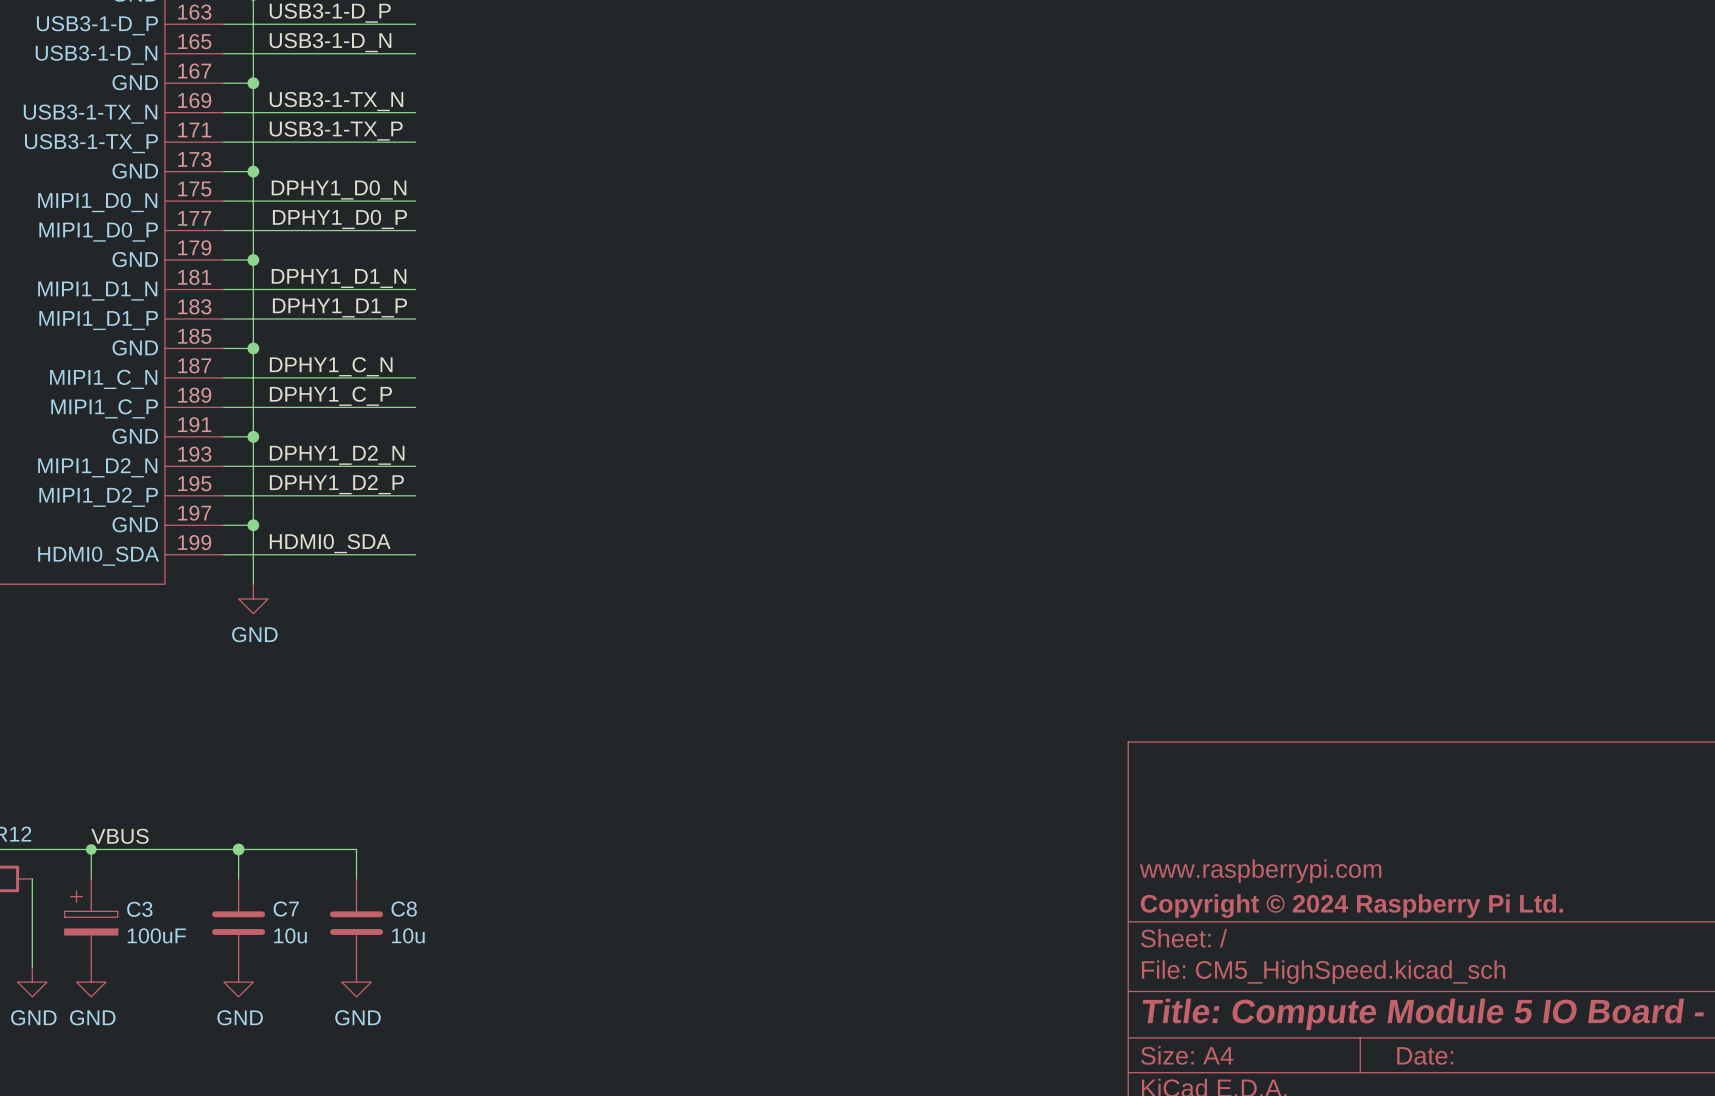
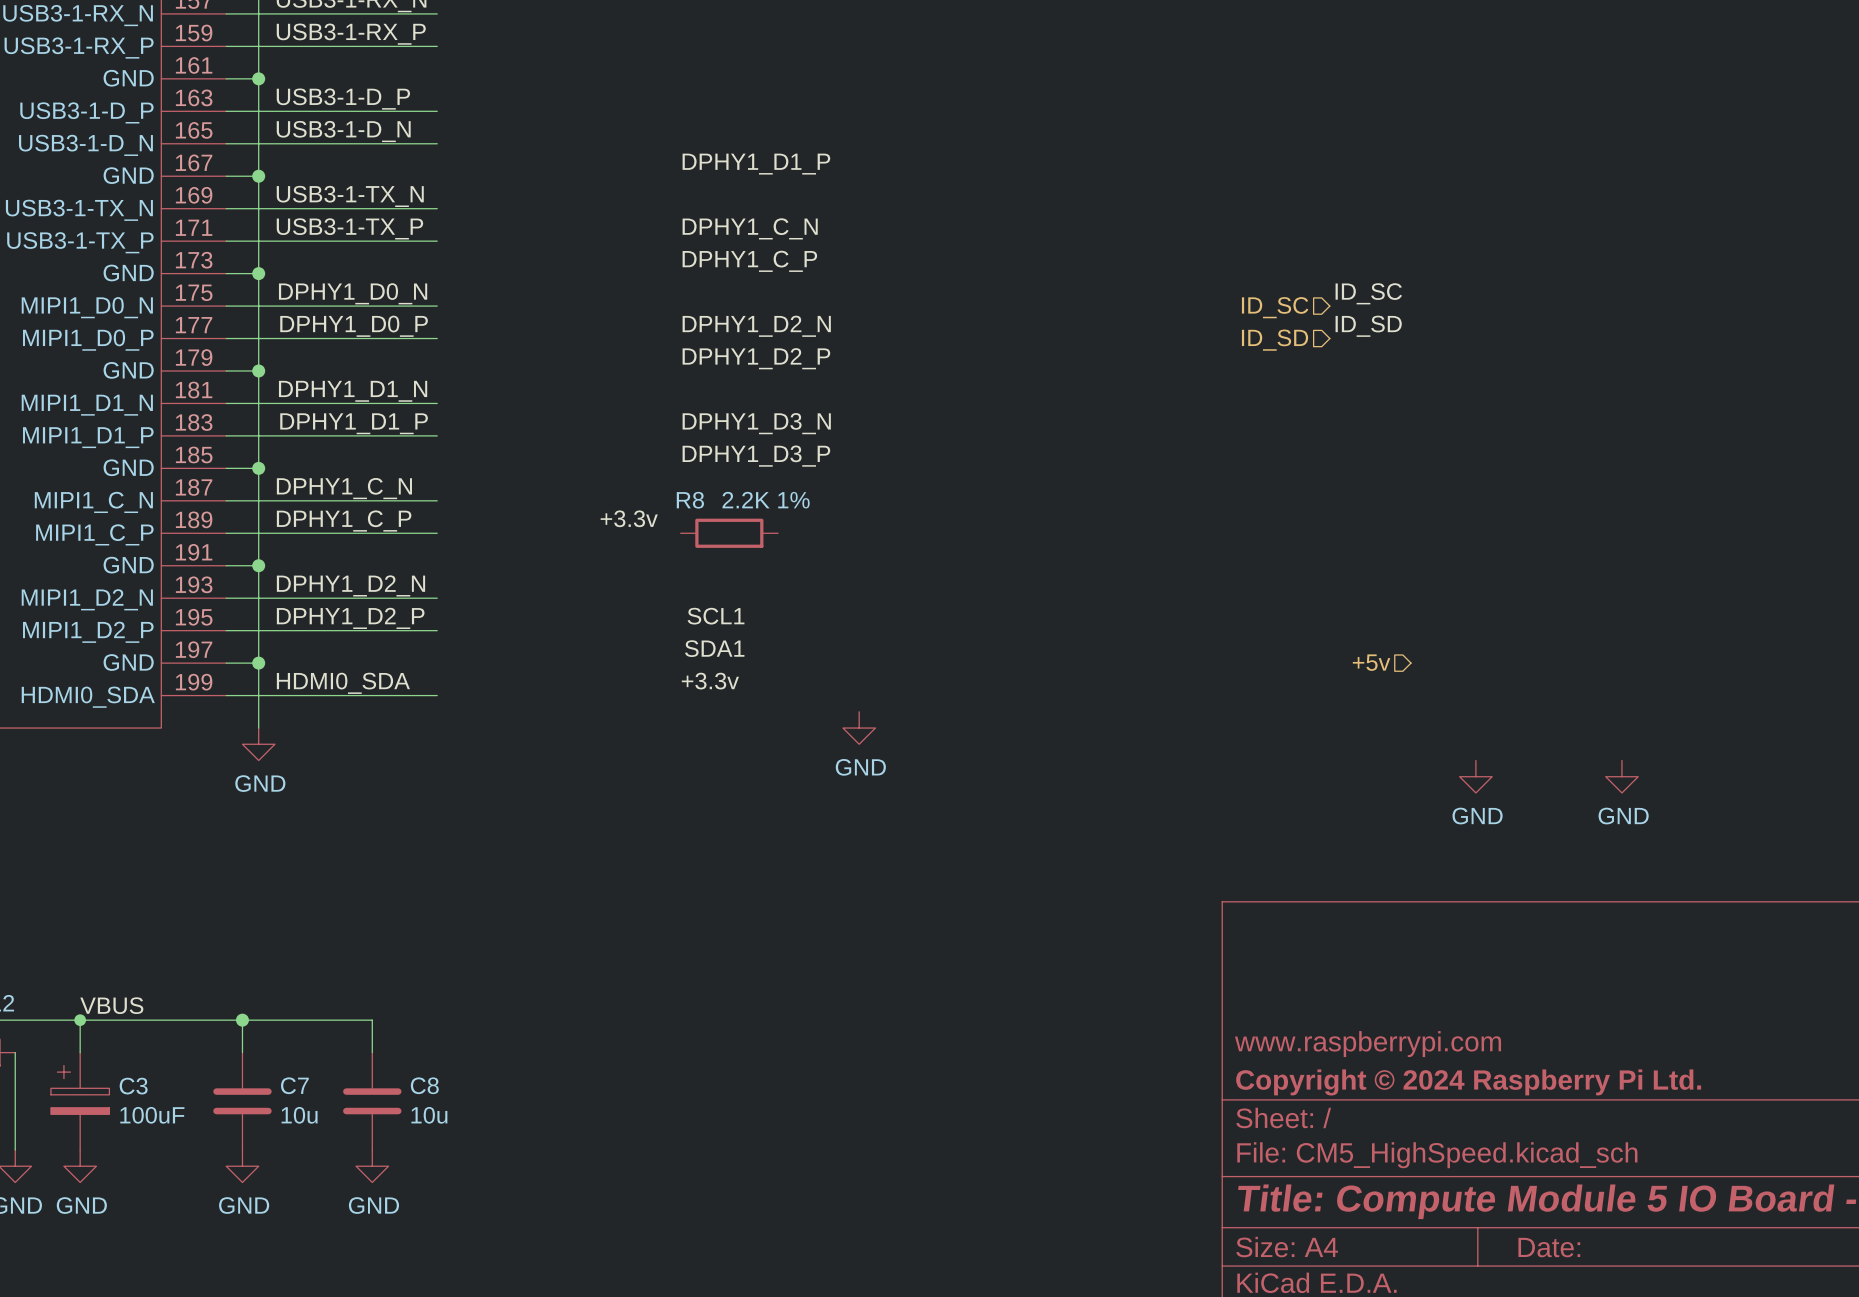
label: none -> DPHY1_D1_P (756, 164)
label: none -> DPHY1_C_N (750, 228)
label: none -> DPHY1_C_P (749, 261)
label: none -> ID_SC (1368, 293)
hierarchical label: none -> ID_SC (1275, 307)
label: none -> DPHY1_D2_N (756, 326)
label: none -> ID_SD (1368, 326)
hierarchical label: none -> ID_SD (1275, 340)
label: none -> DPHY1_D2_P (756, 358)
label: none -> DPHY1_D3_N (756, 423)
label: none -> DPHY1_D3_P (756, 456)
label: none -> +3.3v (629, 518)
R8: none -> 2.2K 1% (729, 533)
label: none -> SCL1 (716, 616)
label: none -> SDA1 (714, 648)
hierarchical label: none -> +5v (1371, 662)
label: none -> +3.3v (710, 681)
power symbol: none -> GND (859, 728)
power symbol: none -> GND (1475, 776)
power symbol: none -> GND (1621, 776)

